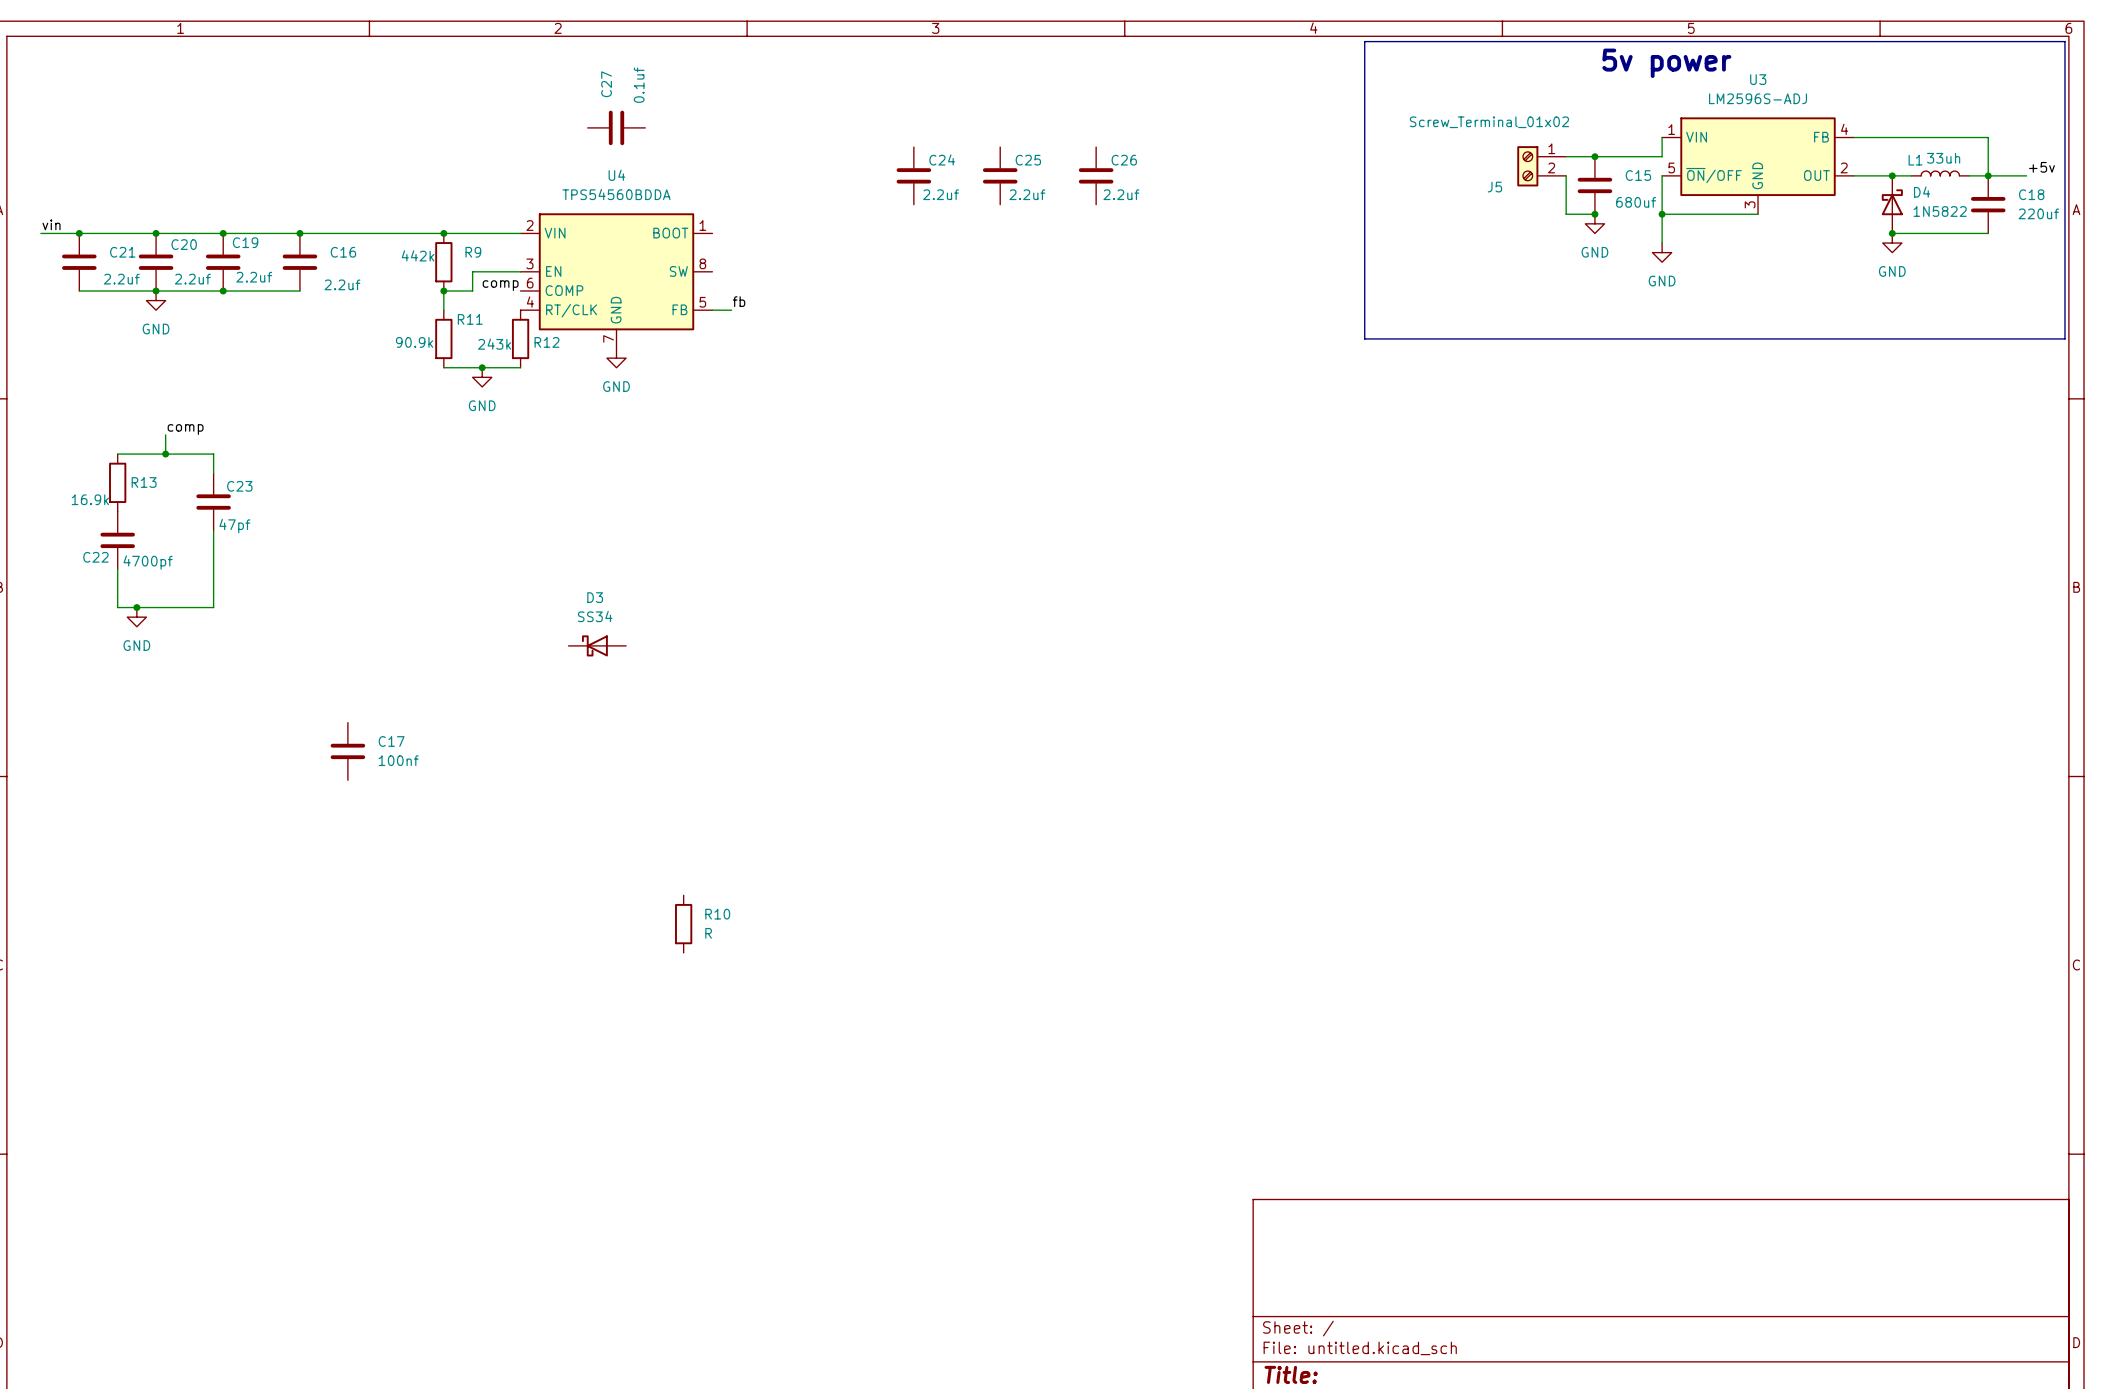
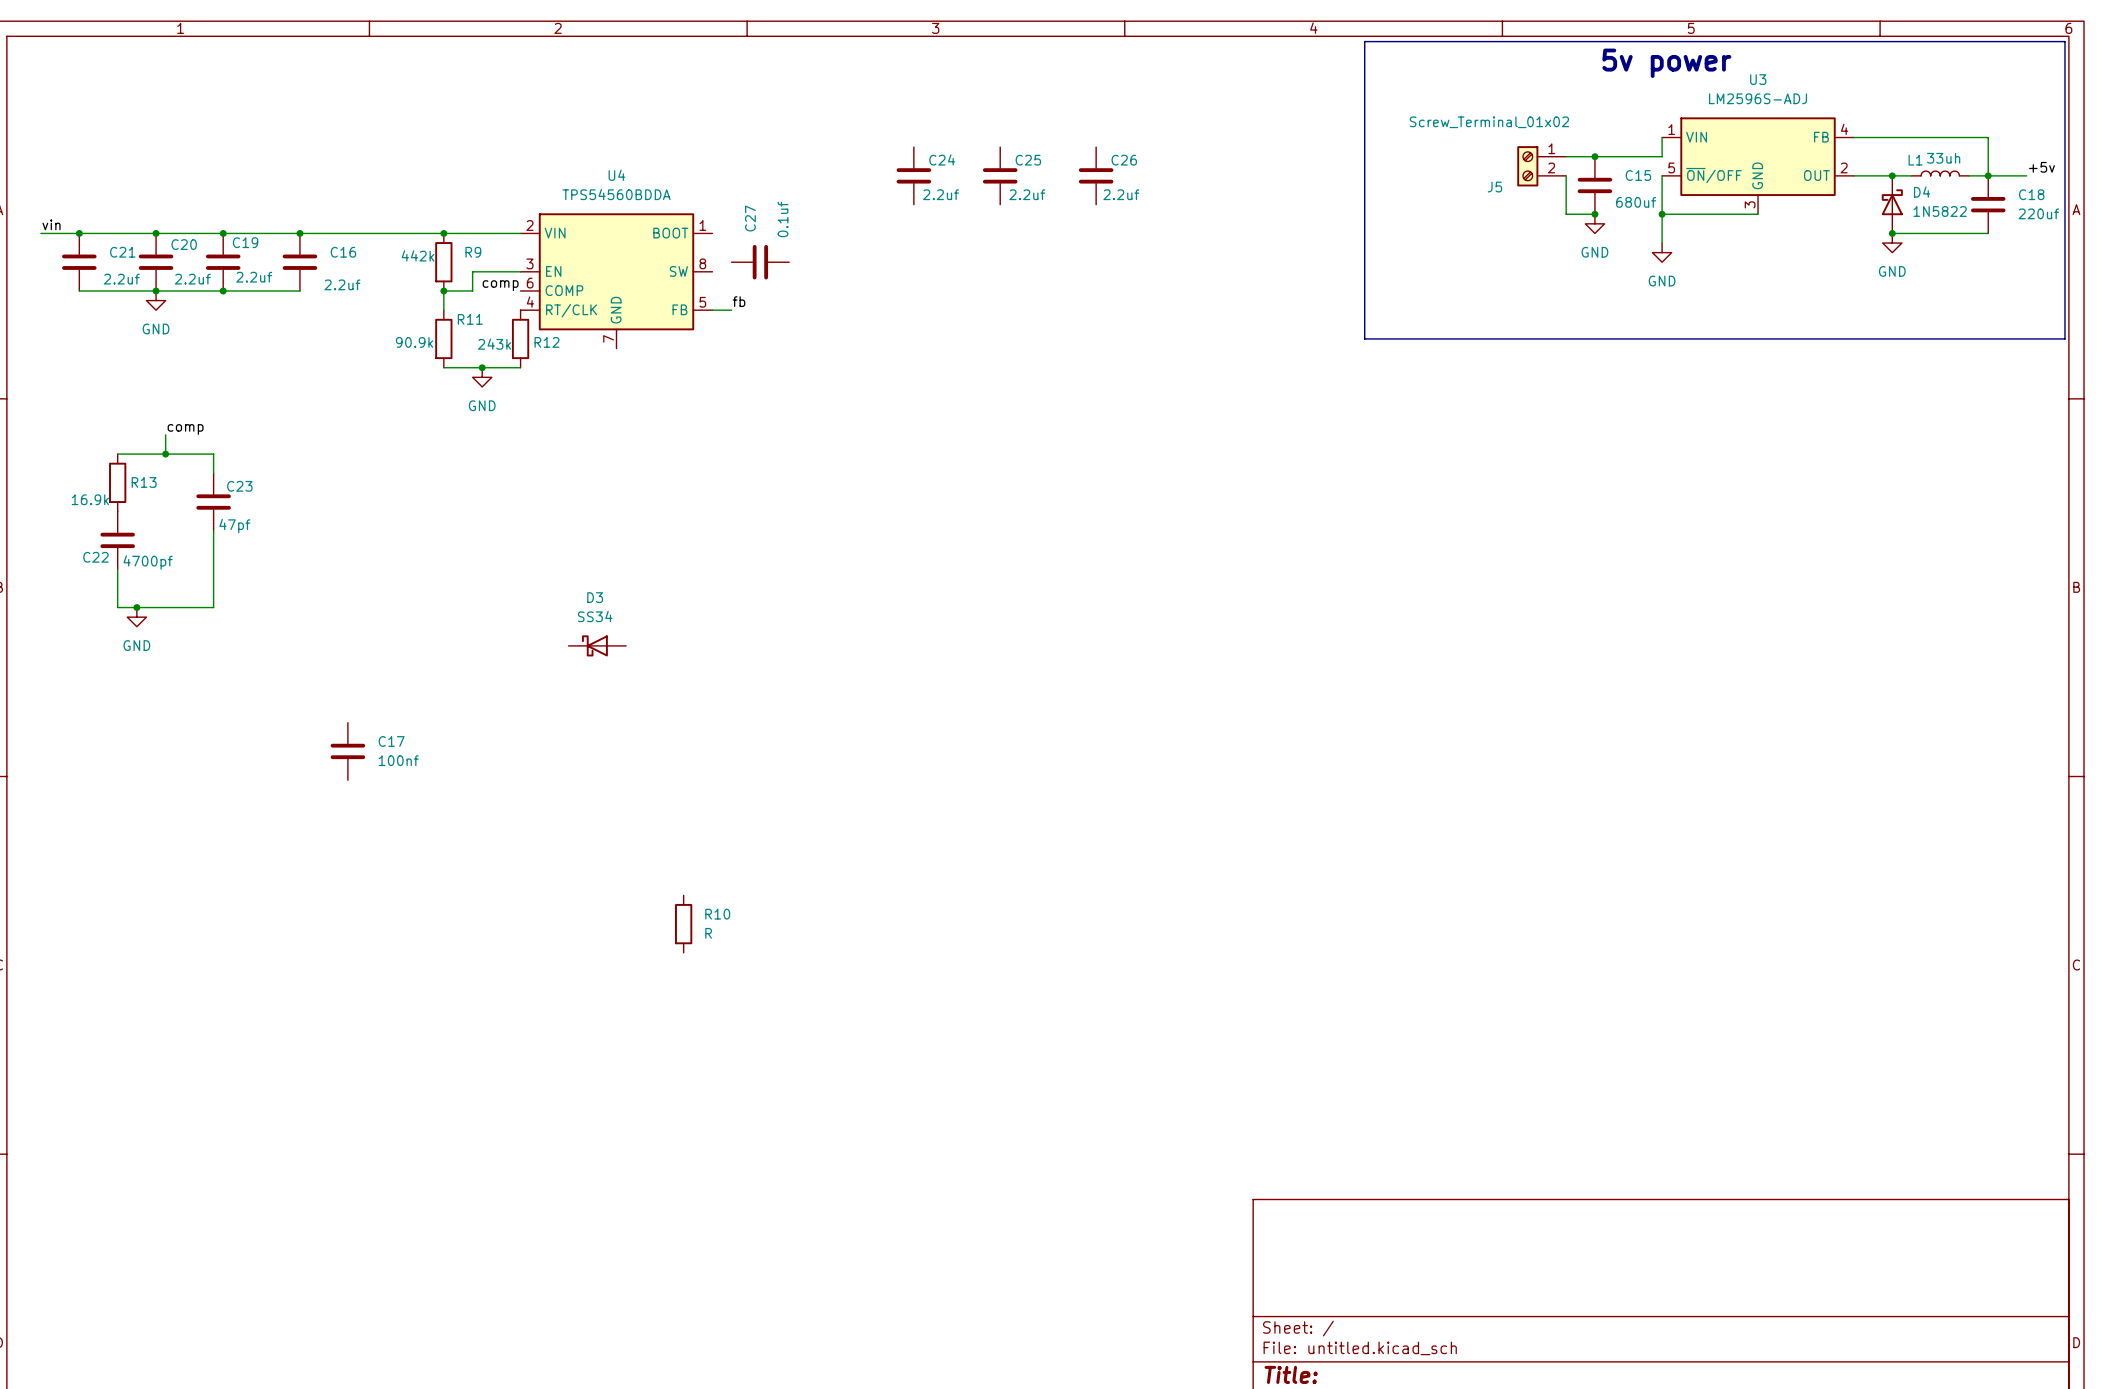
C27 position: (616, 127) -> (760, 262)
power symbol: GND (616, 358) -> none

